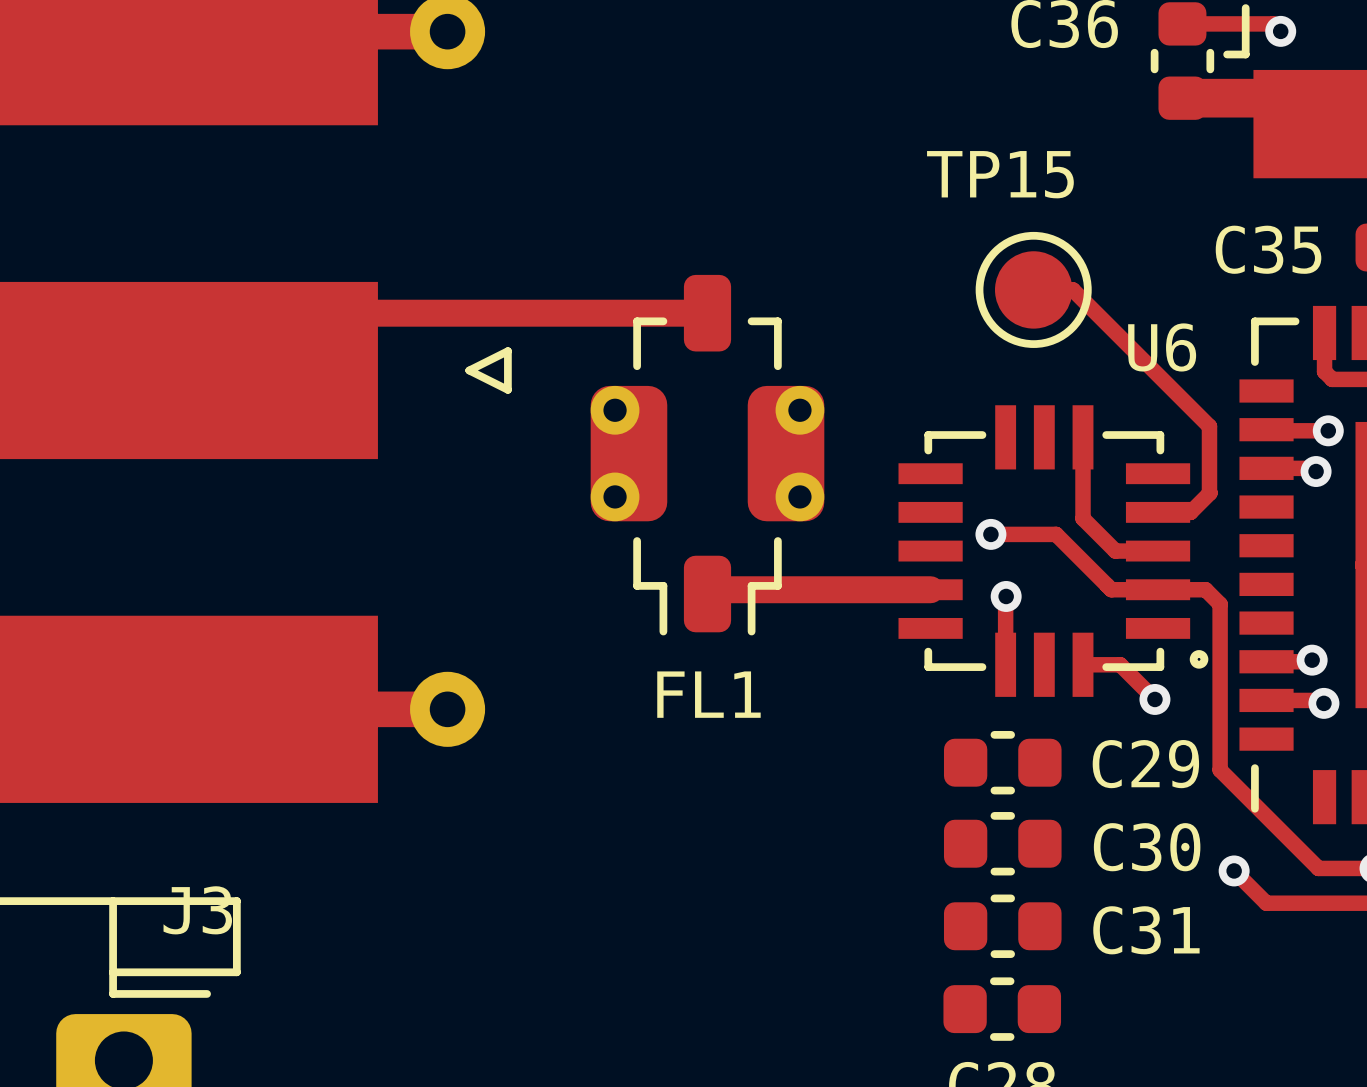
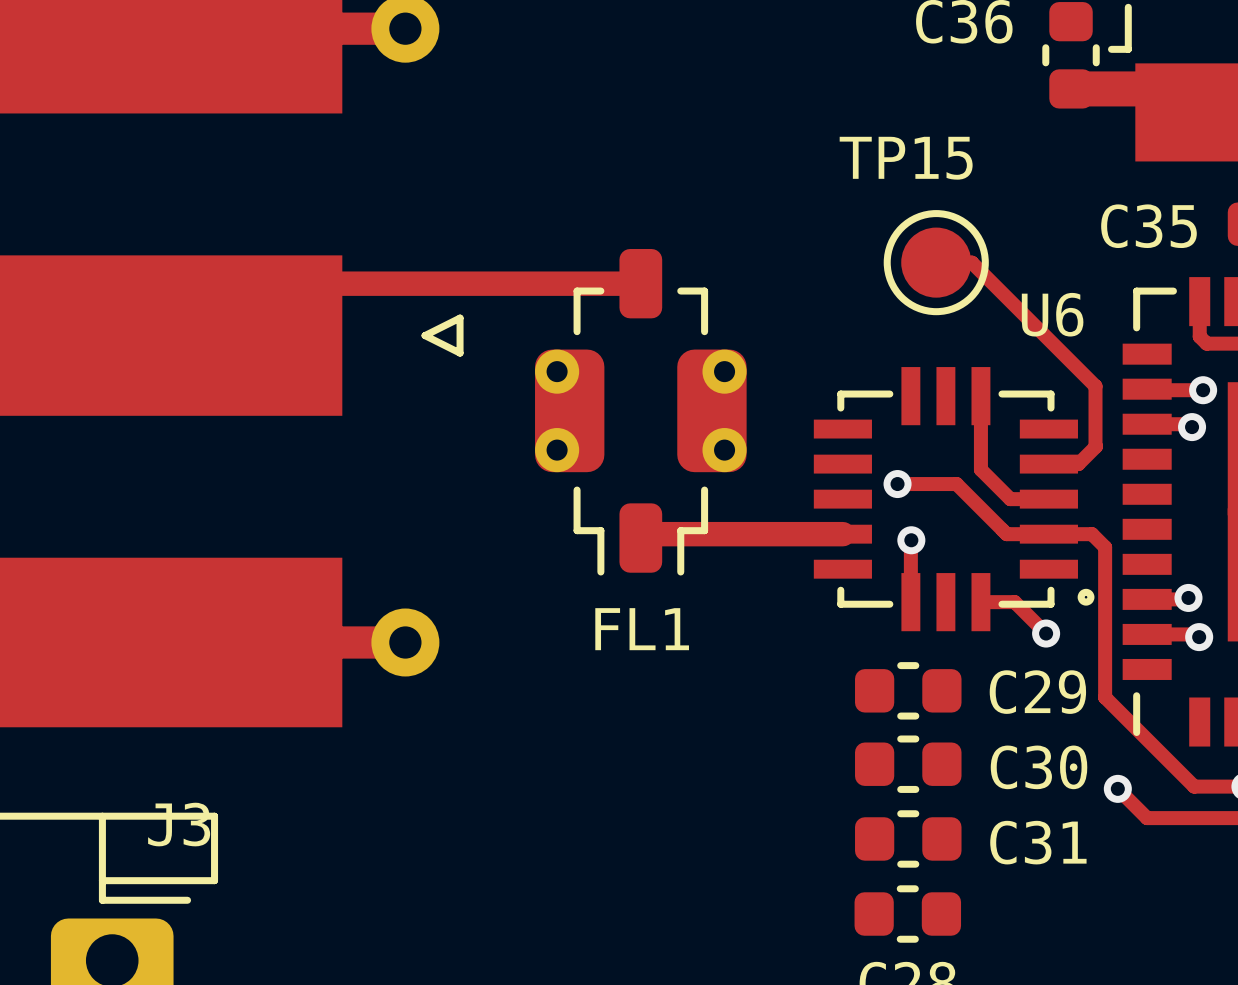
track: (1182, 23) (1273, 23) (1280, 31) -> none
via: (1280, 31) -> none

